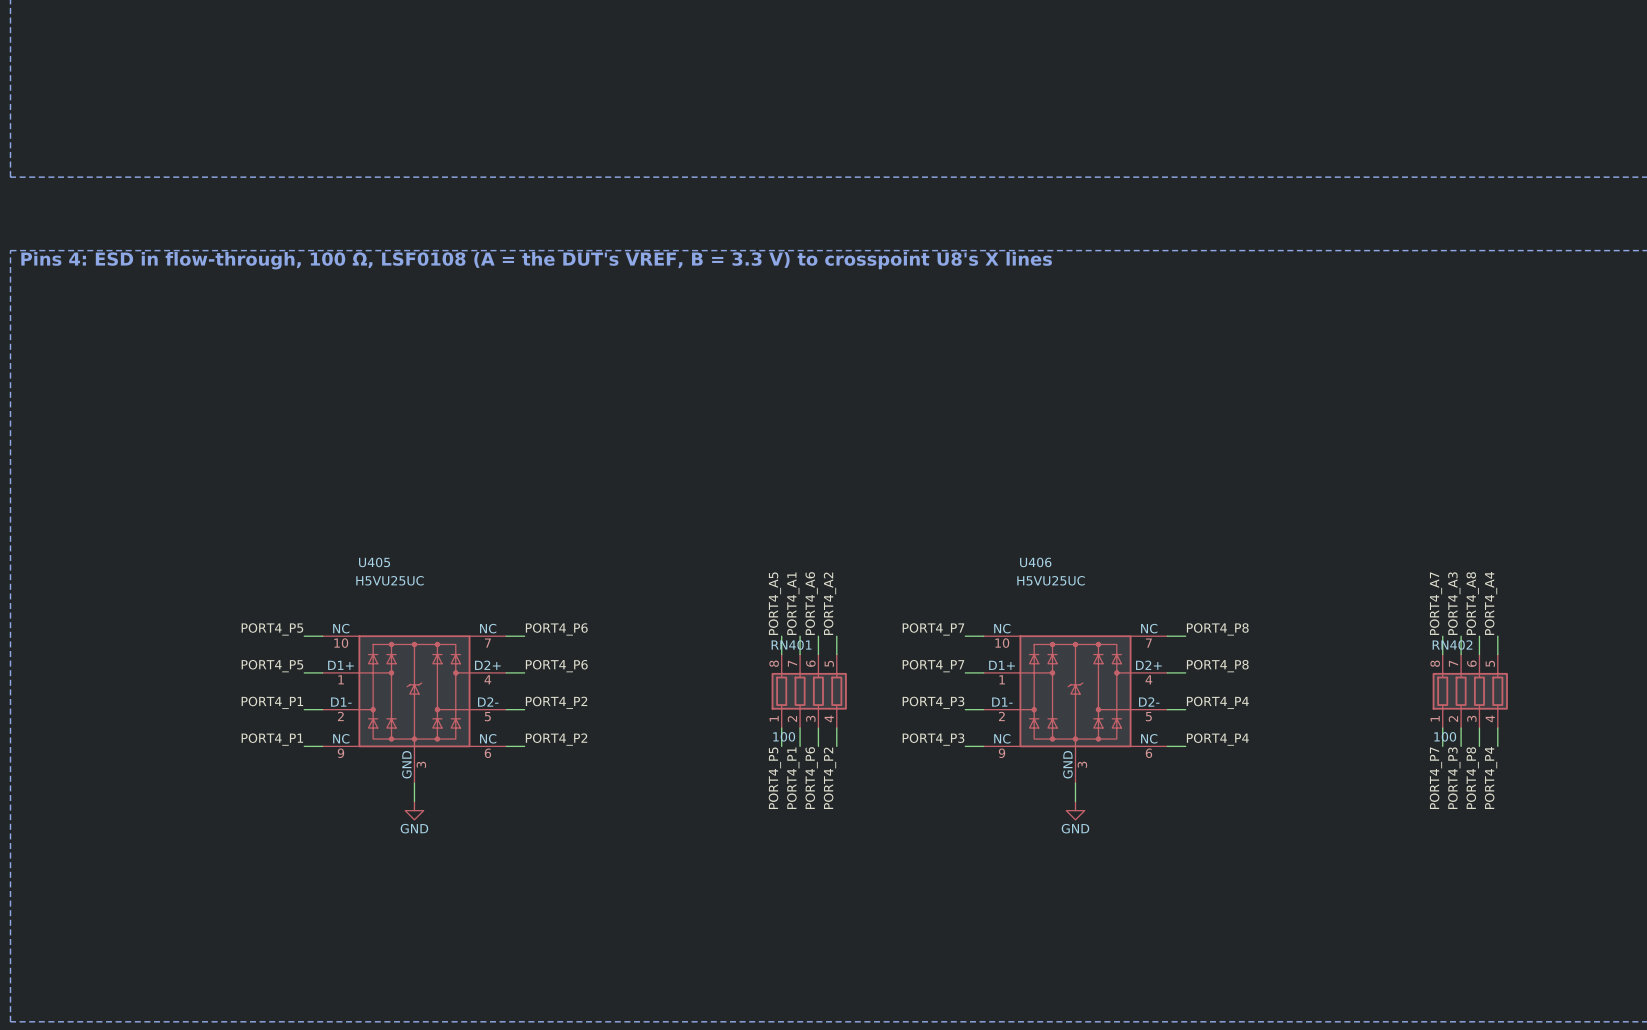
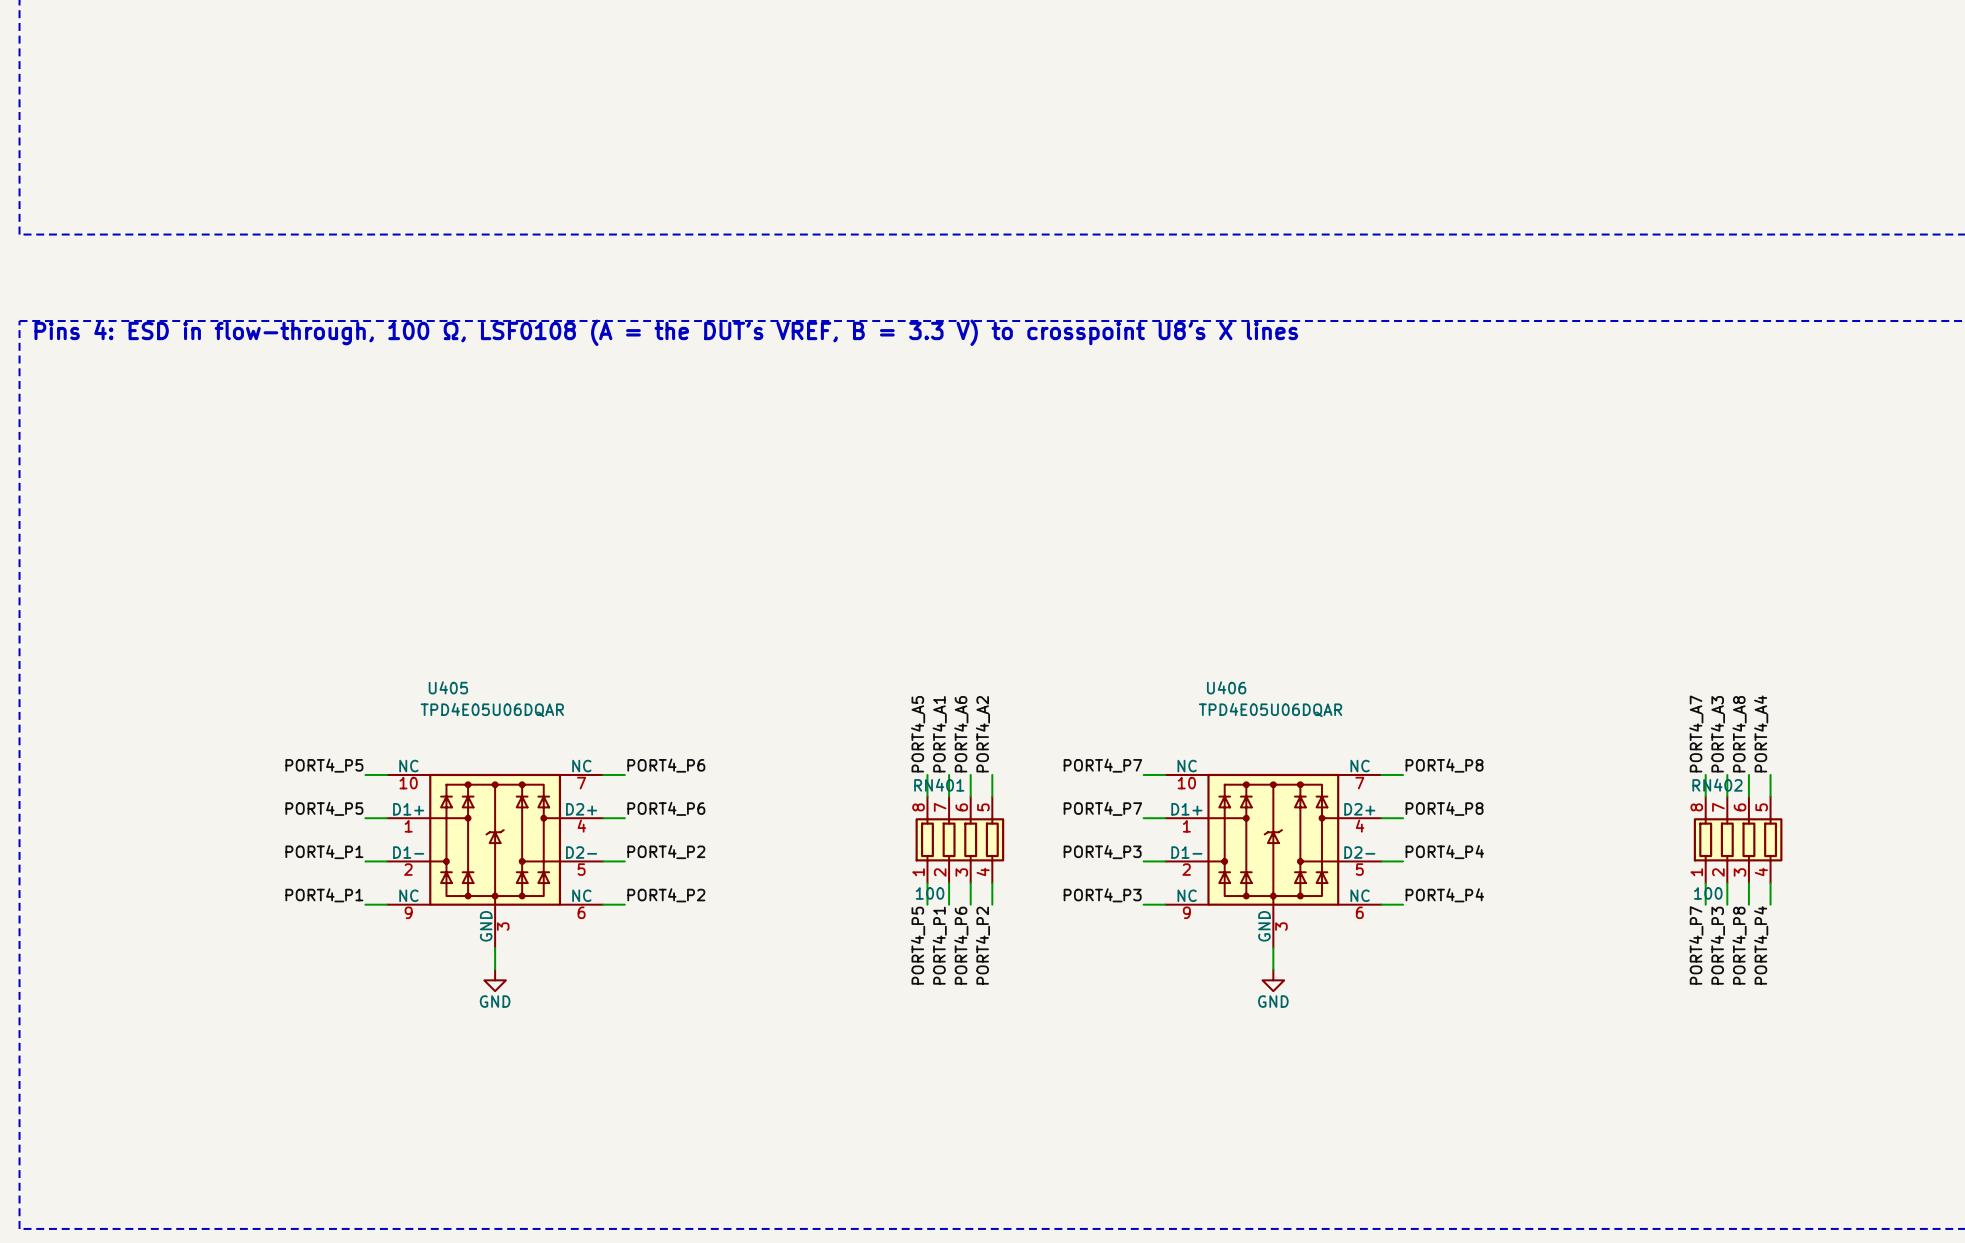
U405 value: H5VU25UC (390, 580) -> TPD4E05U06DQAR (492, 709)
U406 value: H5VU25UC (1051, 580) -> TPD4E05U06DQAR (1270, 709)

